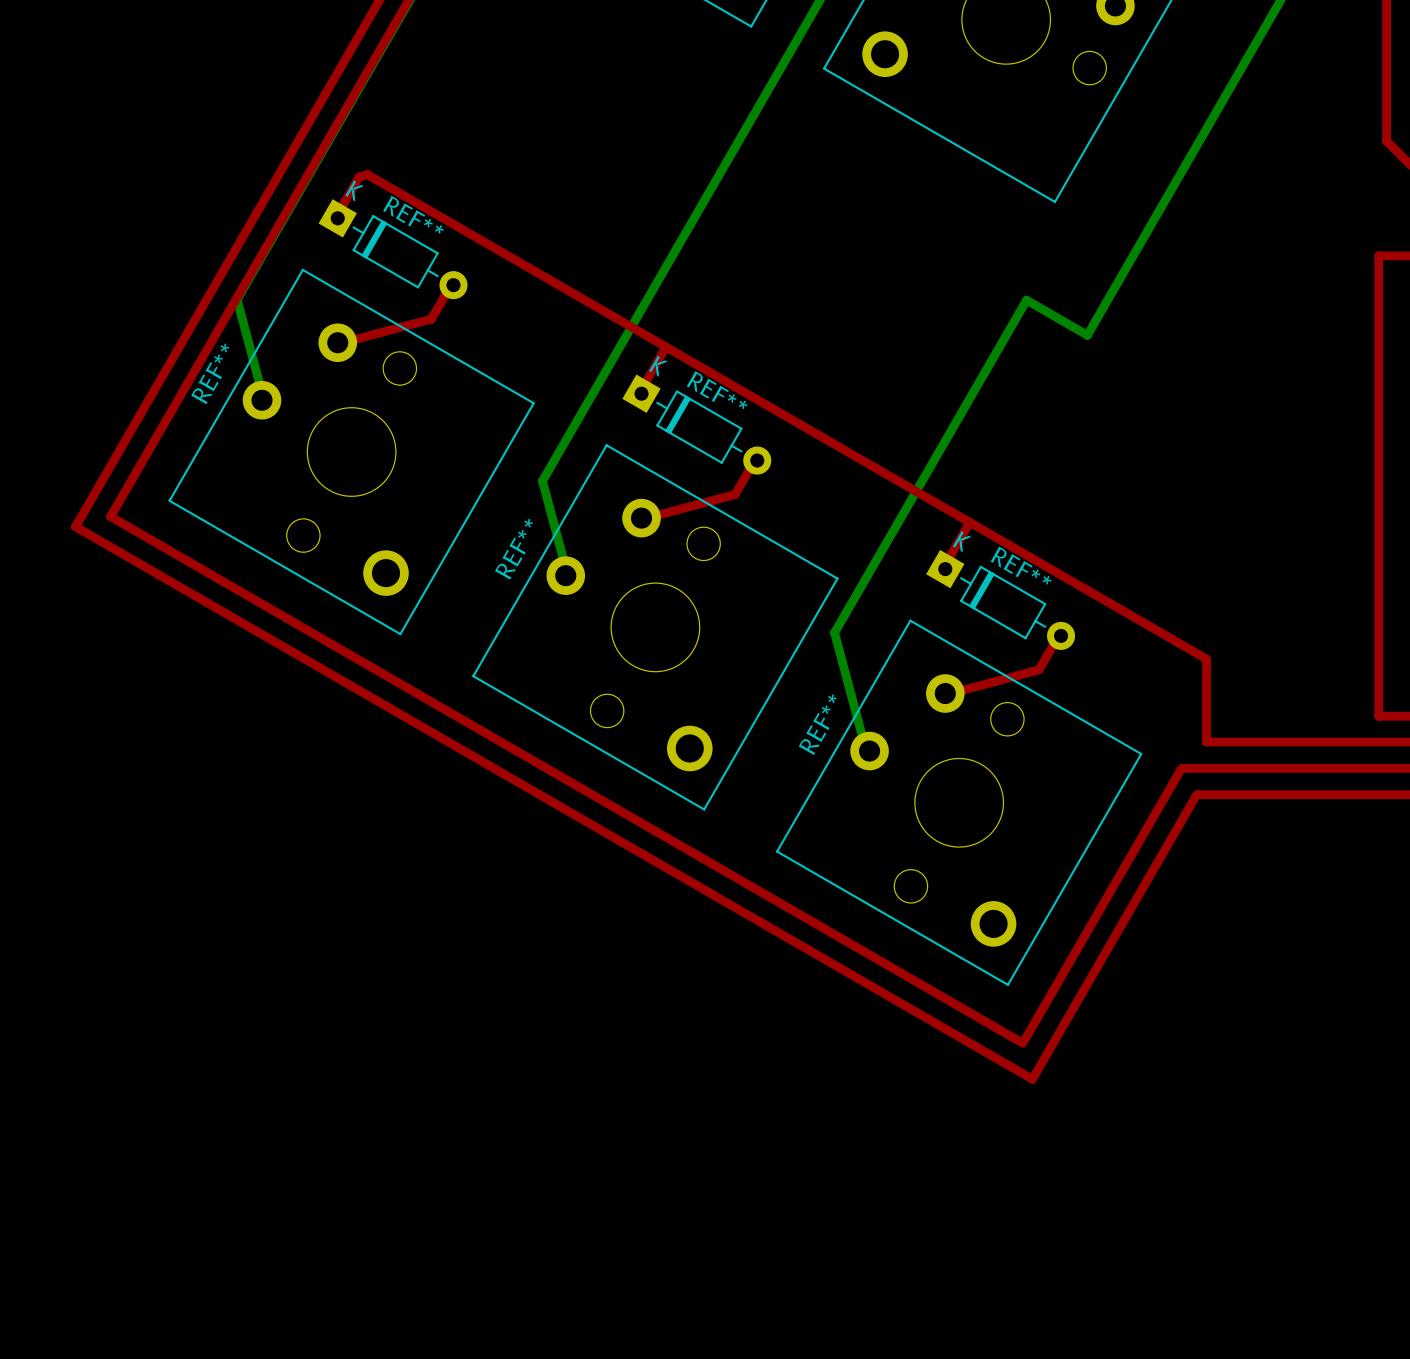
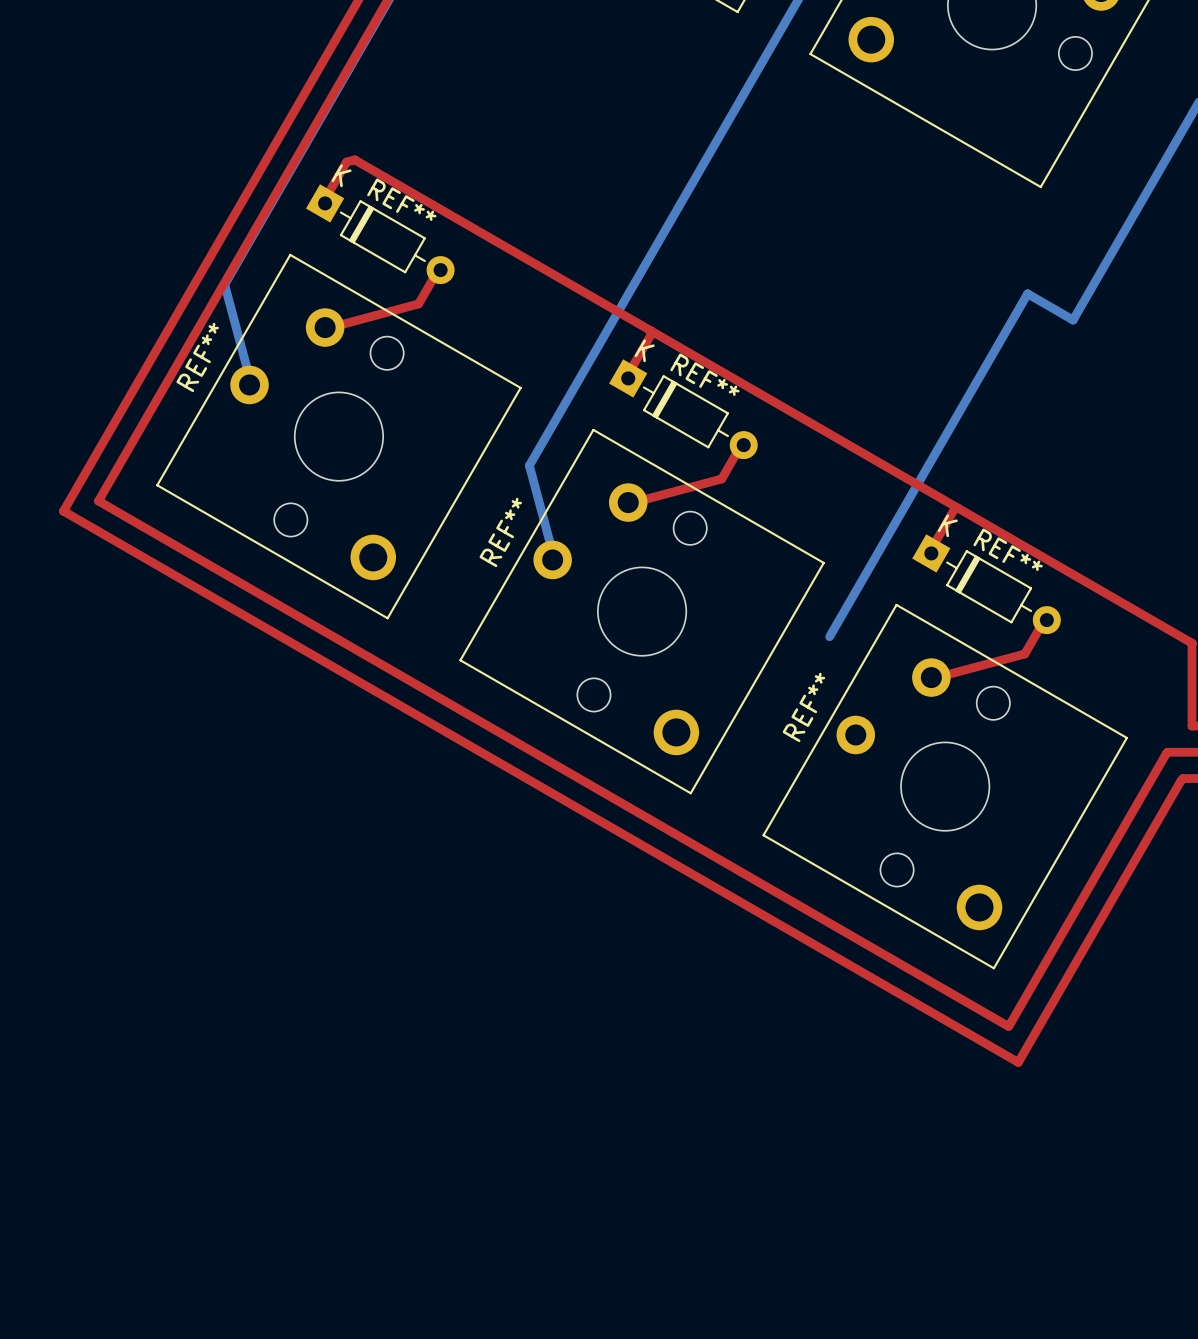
bottom track: (1041, 308) (1026, 300) (834, 632) (867, 755) -> (1027, 293) (829, 636)

